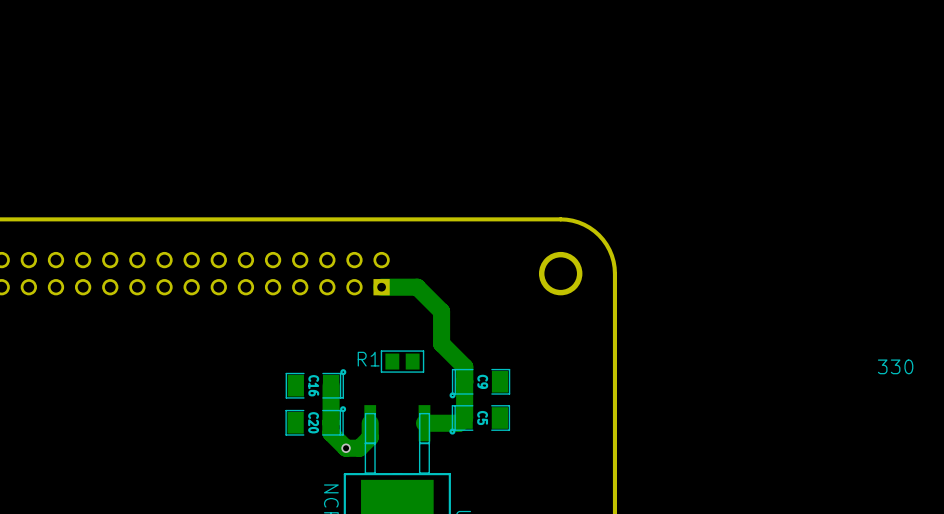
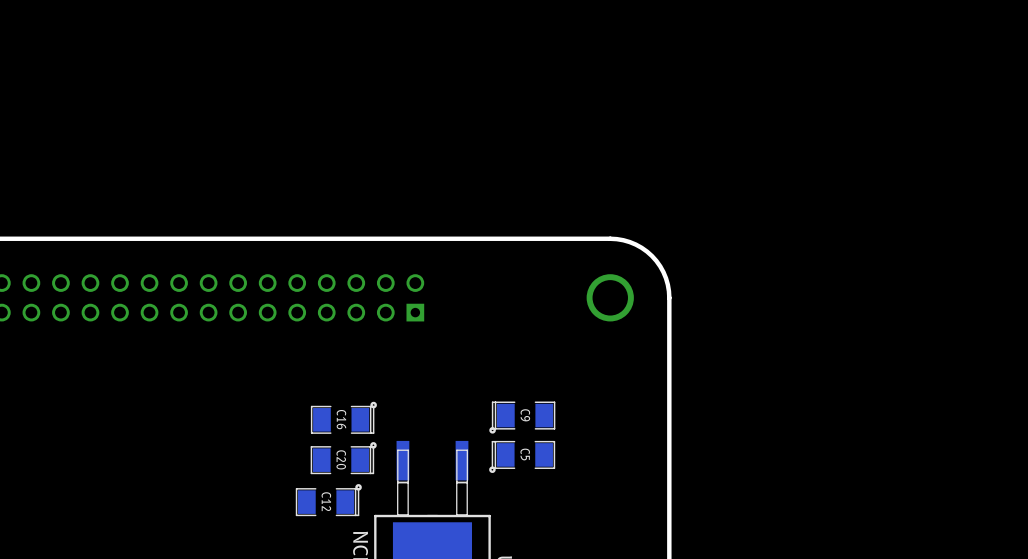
track: (381, 287) (417, 287) (441, 311) (441, 343) (464, 366) (464, 381) -> none
R1: 330 (402, 361) -> none
track: (464, 381) (464, 417) (459, 423) (424, 423) -> none
track: (331, 385) (330, 433) (346, 448) (359, 448) (370, 437) (370, 423) -> none
via: (346, 448) -> none
C12: none -> (328, 500)

